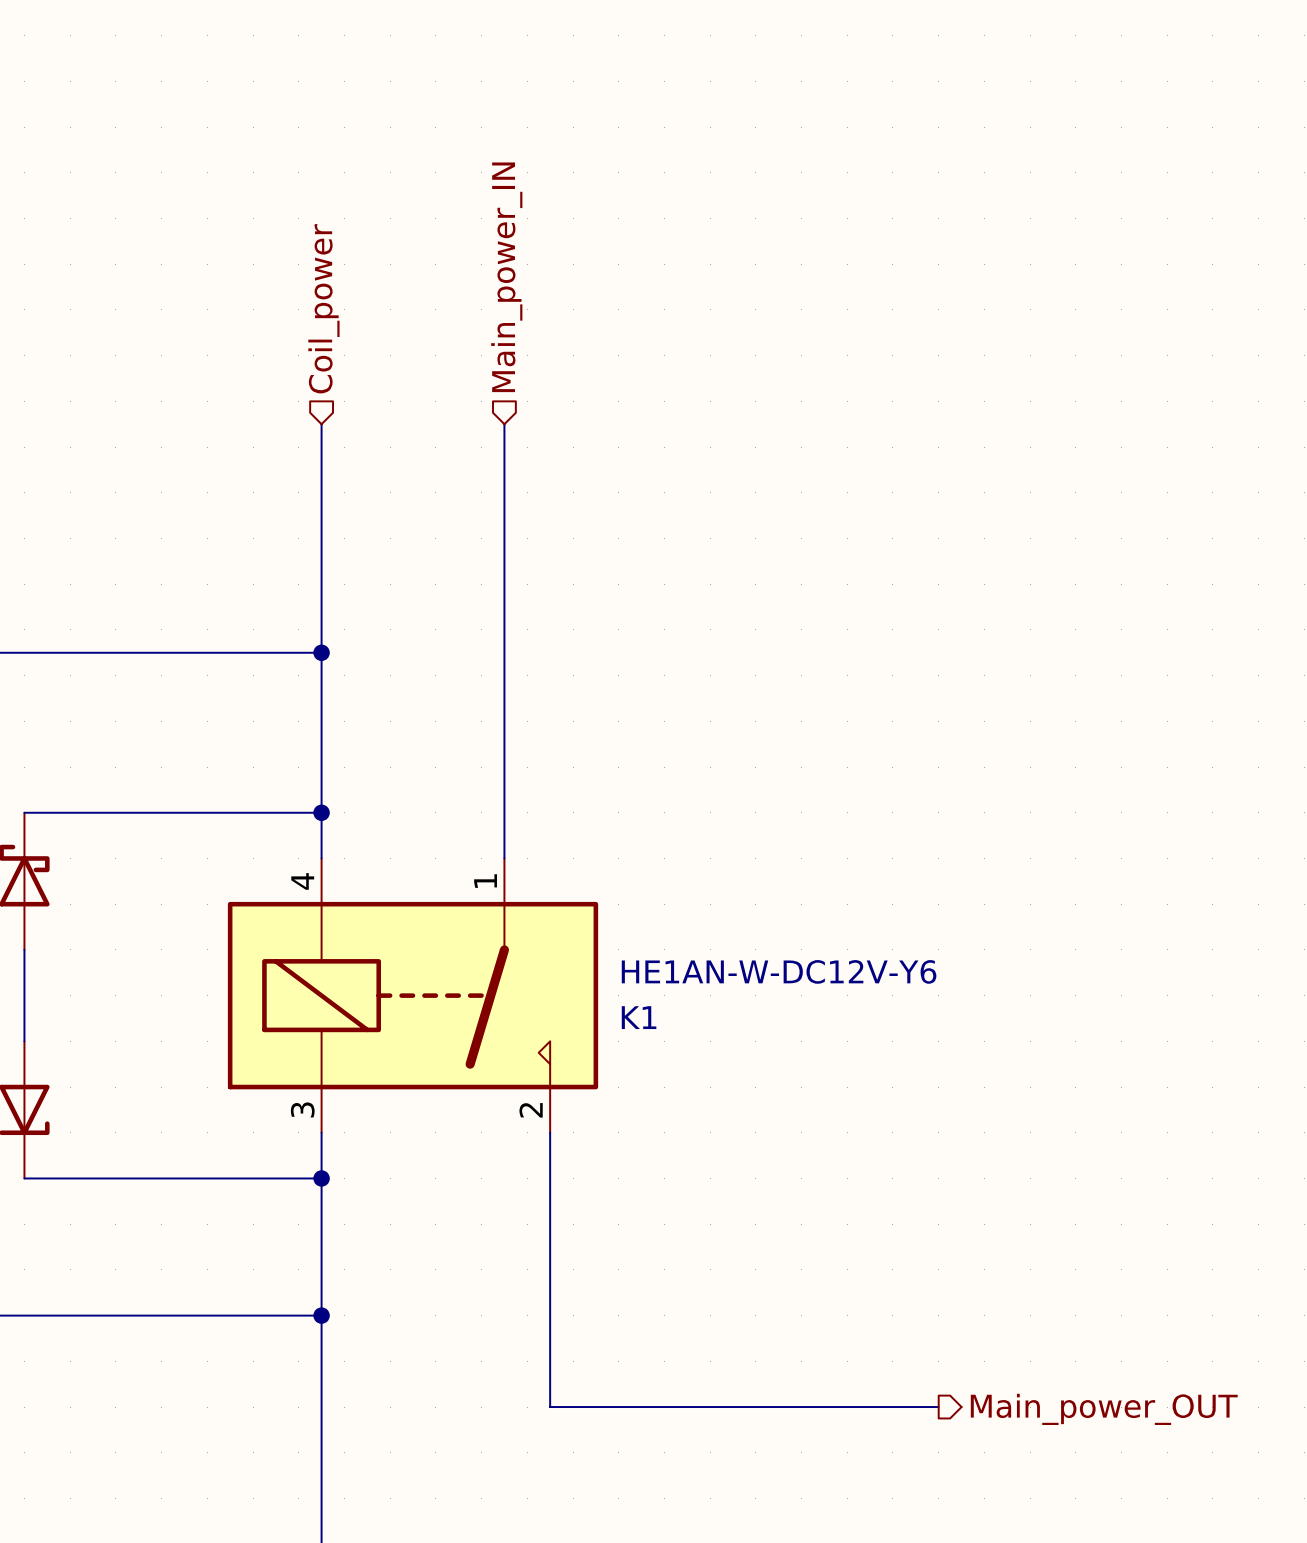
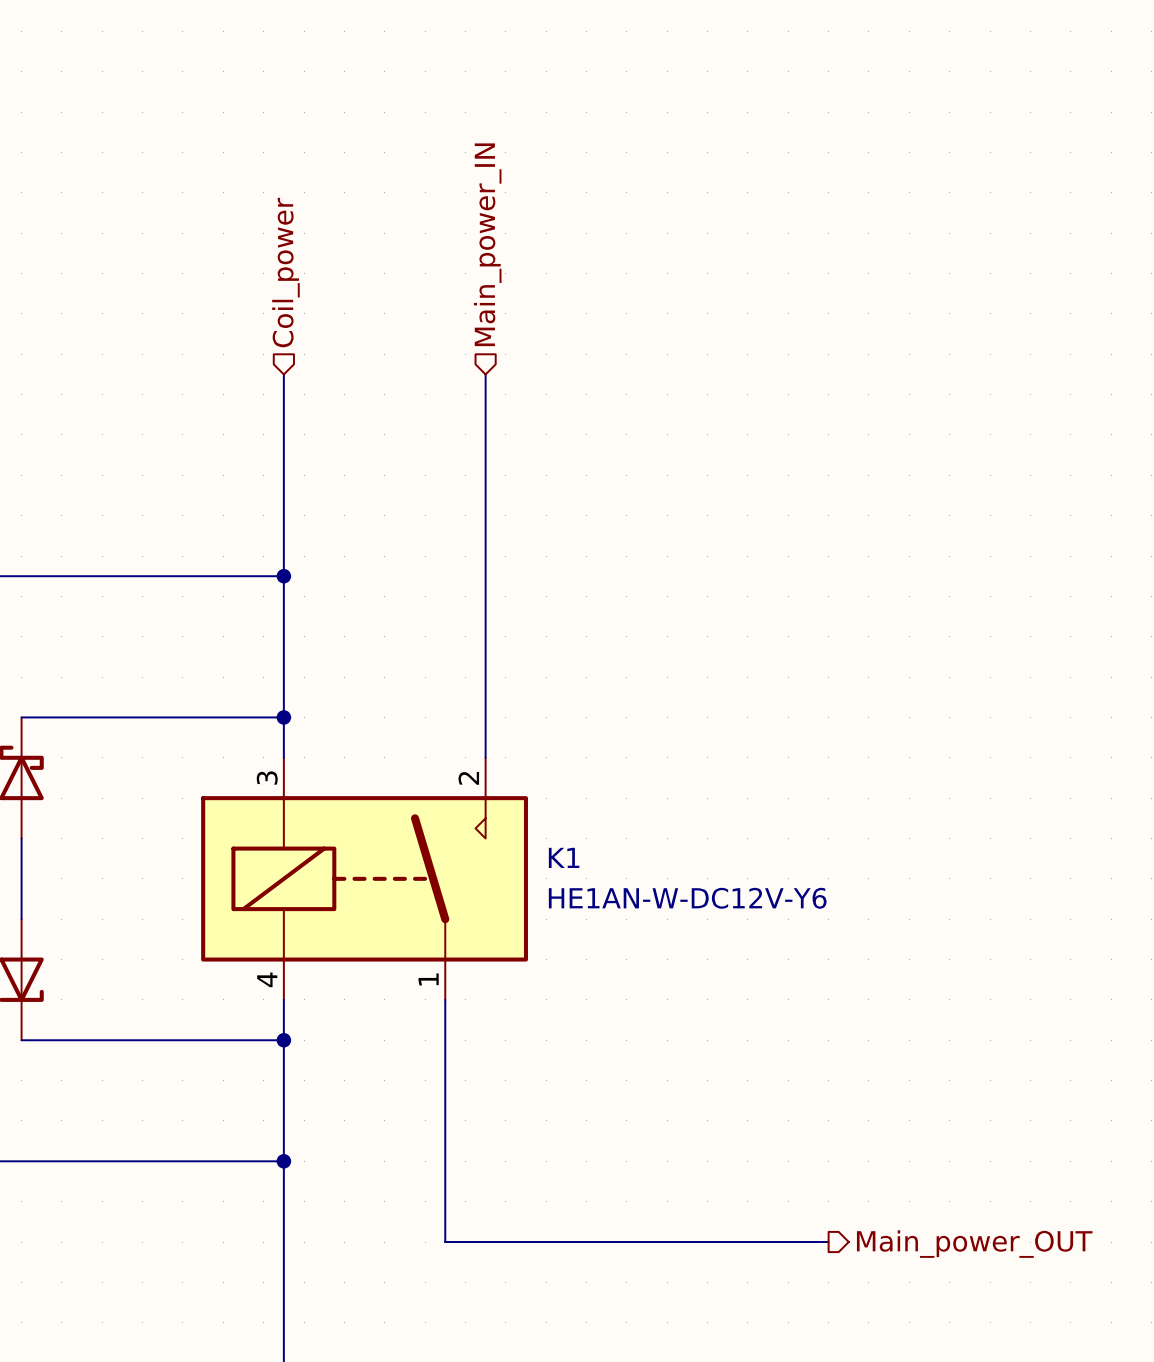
hierarchical label position: Main_power_IN (506, 277) -> Main_power_IN (487, 244)
wire: (504, 424) (504, 858) -> (485, 374) (485, 757)
K1 flip: as is (413, 995) -> up-down (364, 878)
wire: (550, 1132) (550, 1407) -> (445, 999) (445, 1242) (485, 1242)

